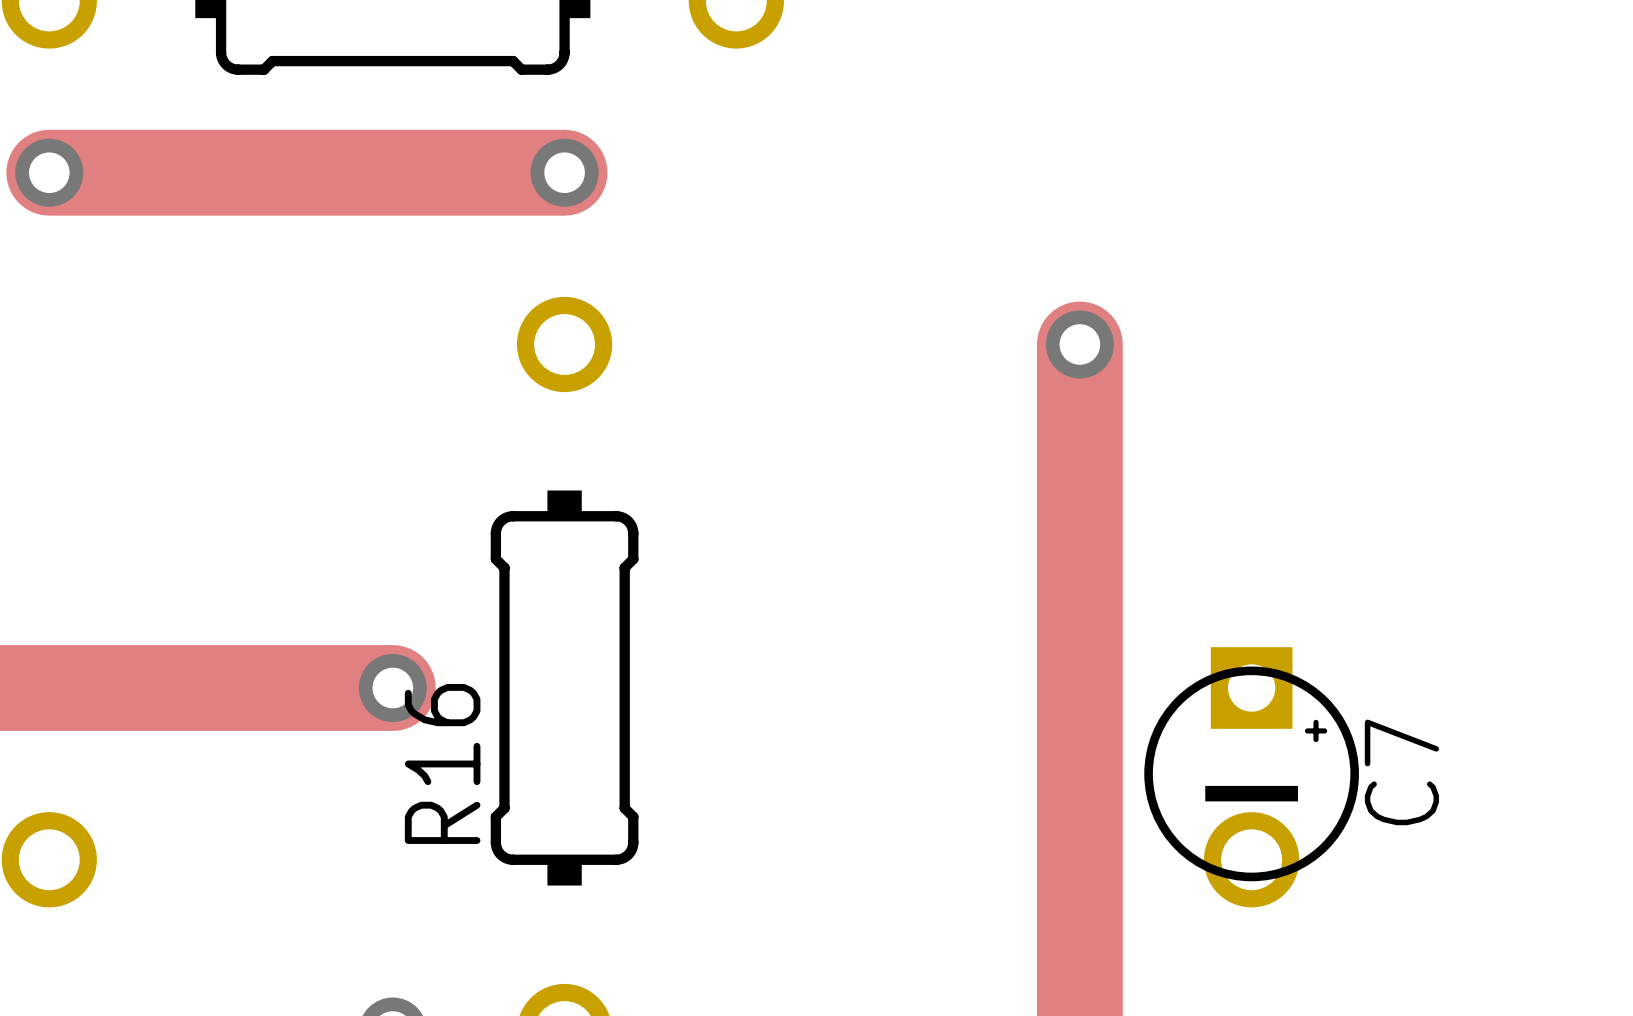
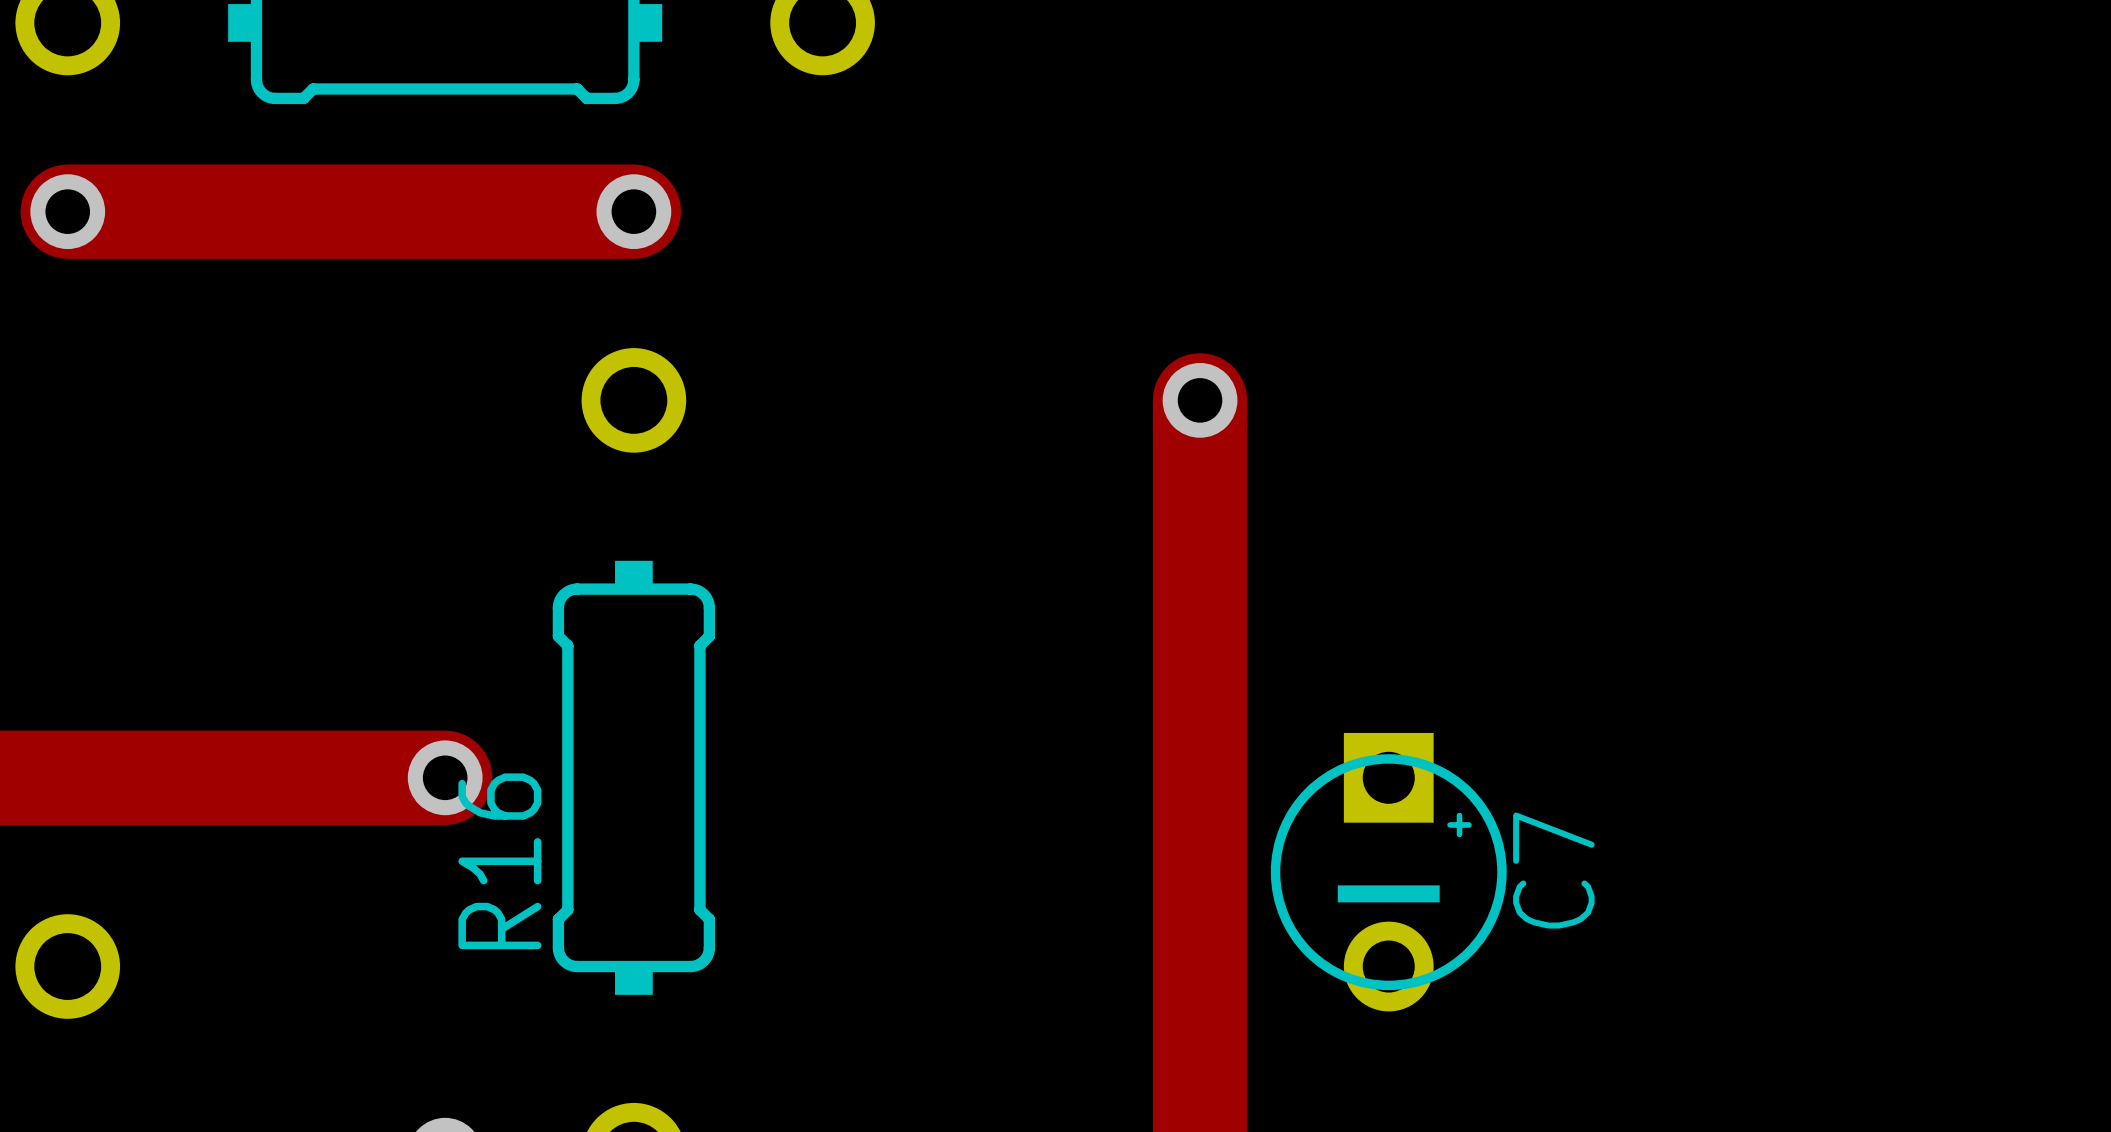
C7 footprint: [1144, 647, 1359, 908] -> [1270, 732, 1507, 1012]

